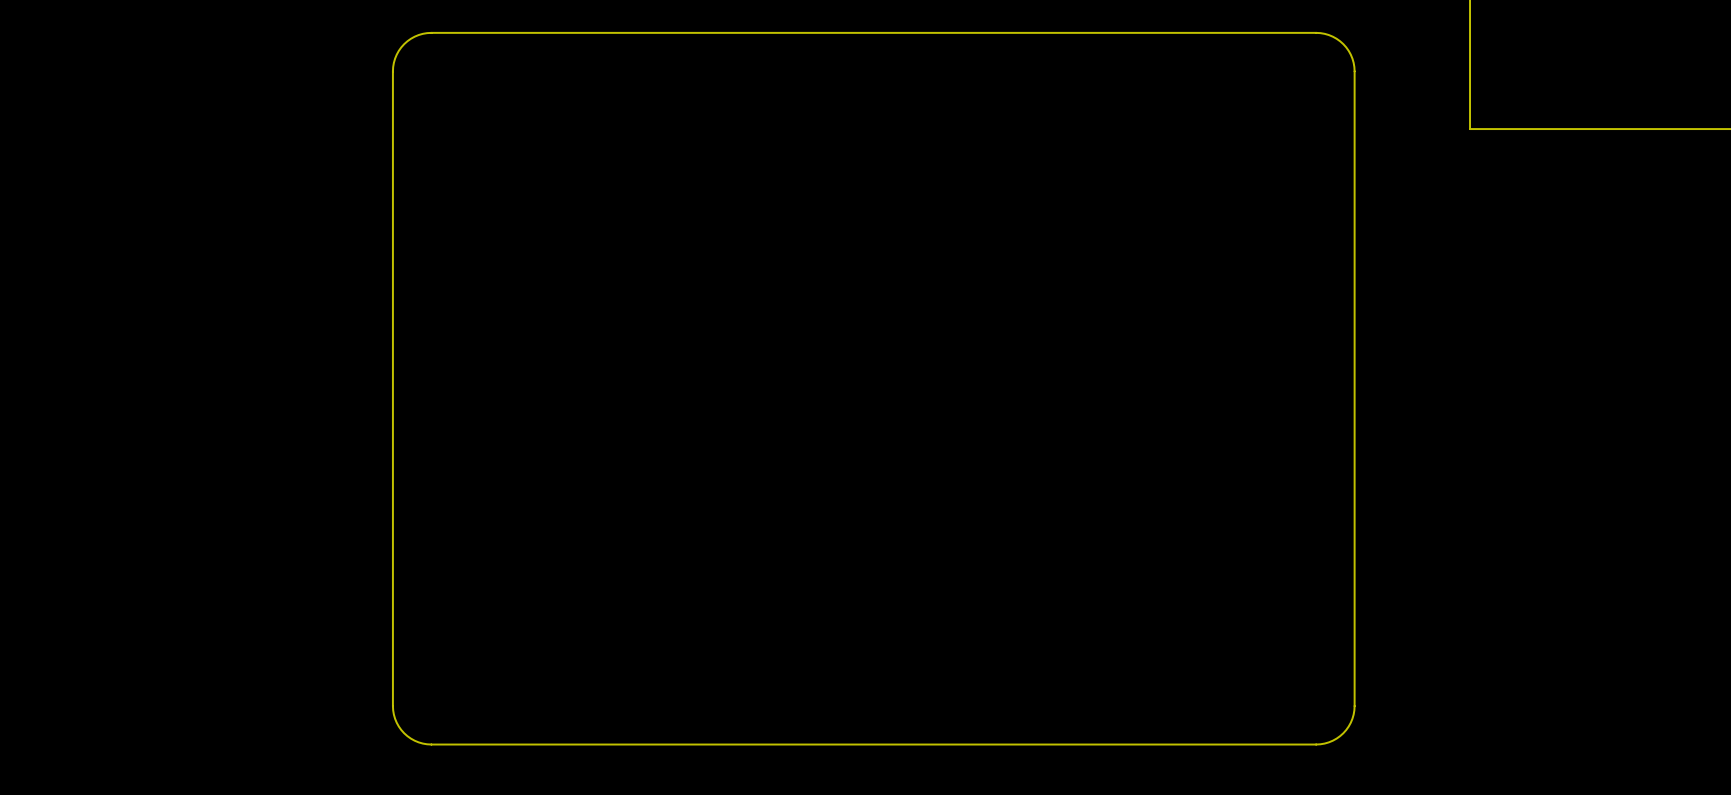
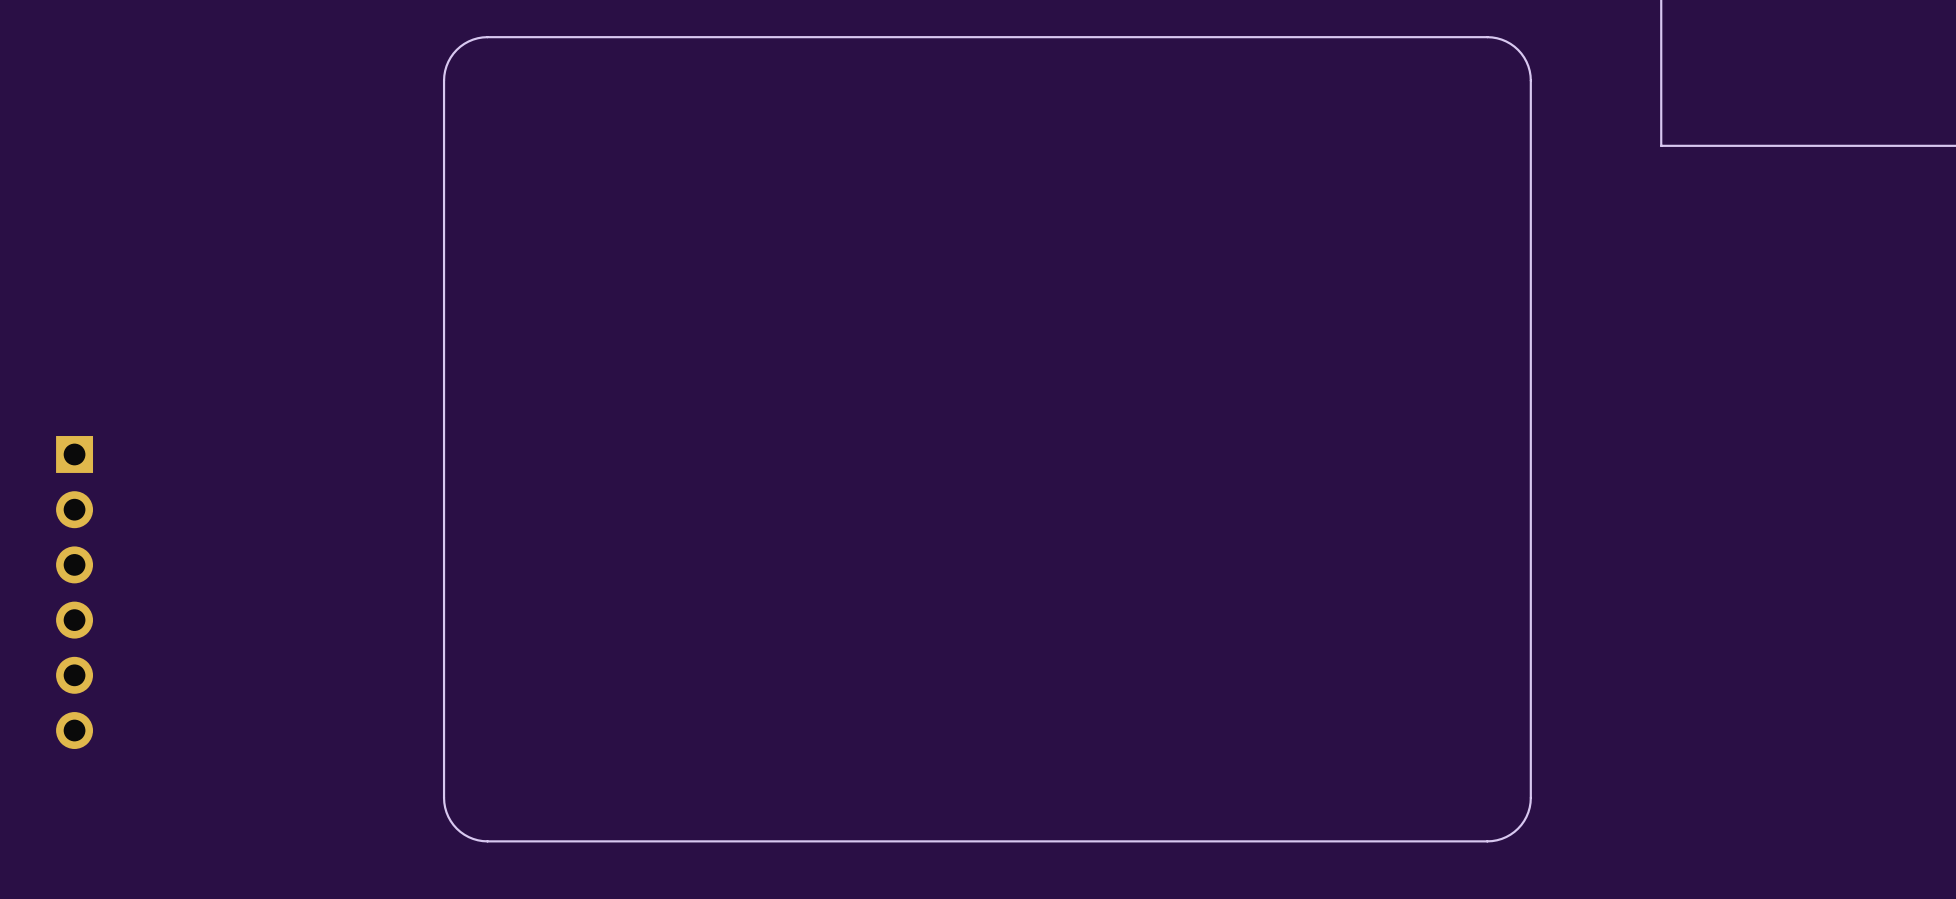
part: none -> (74, 592)

